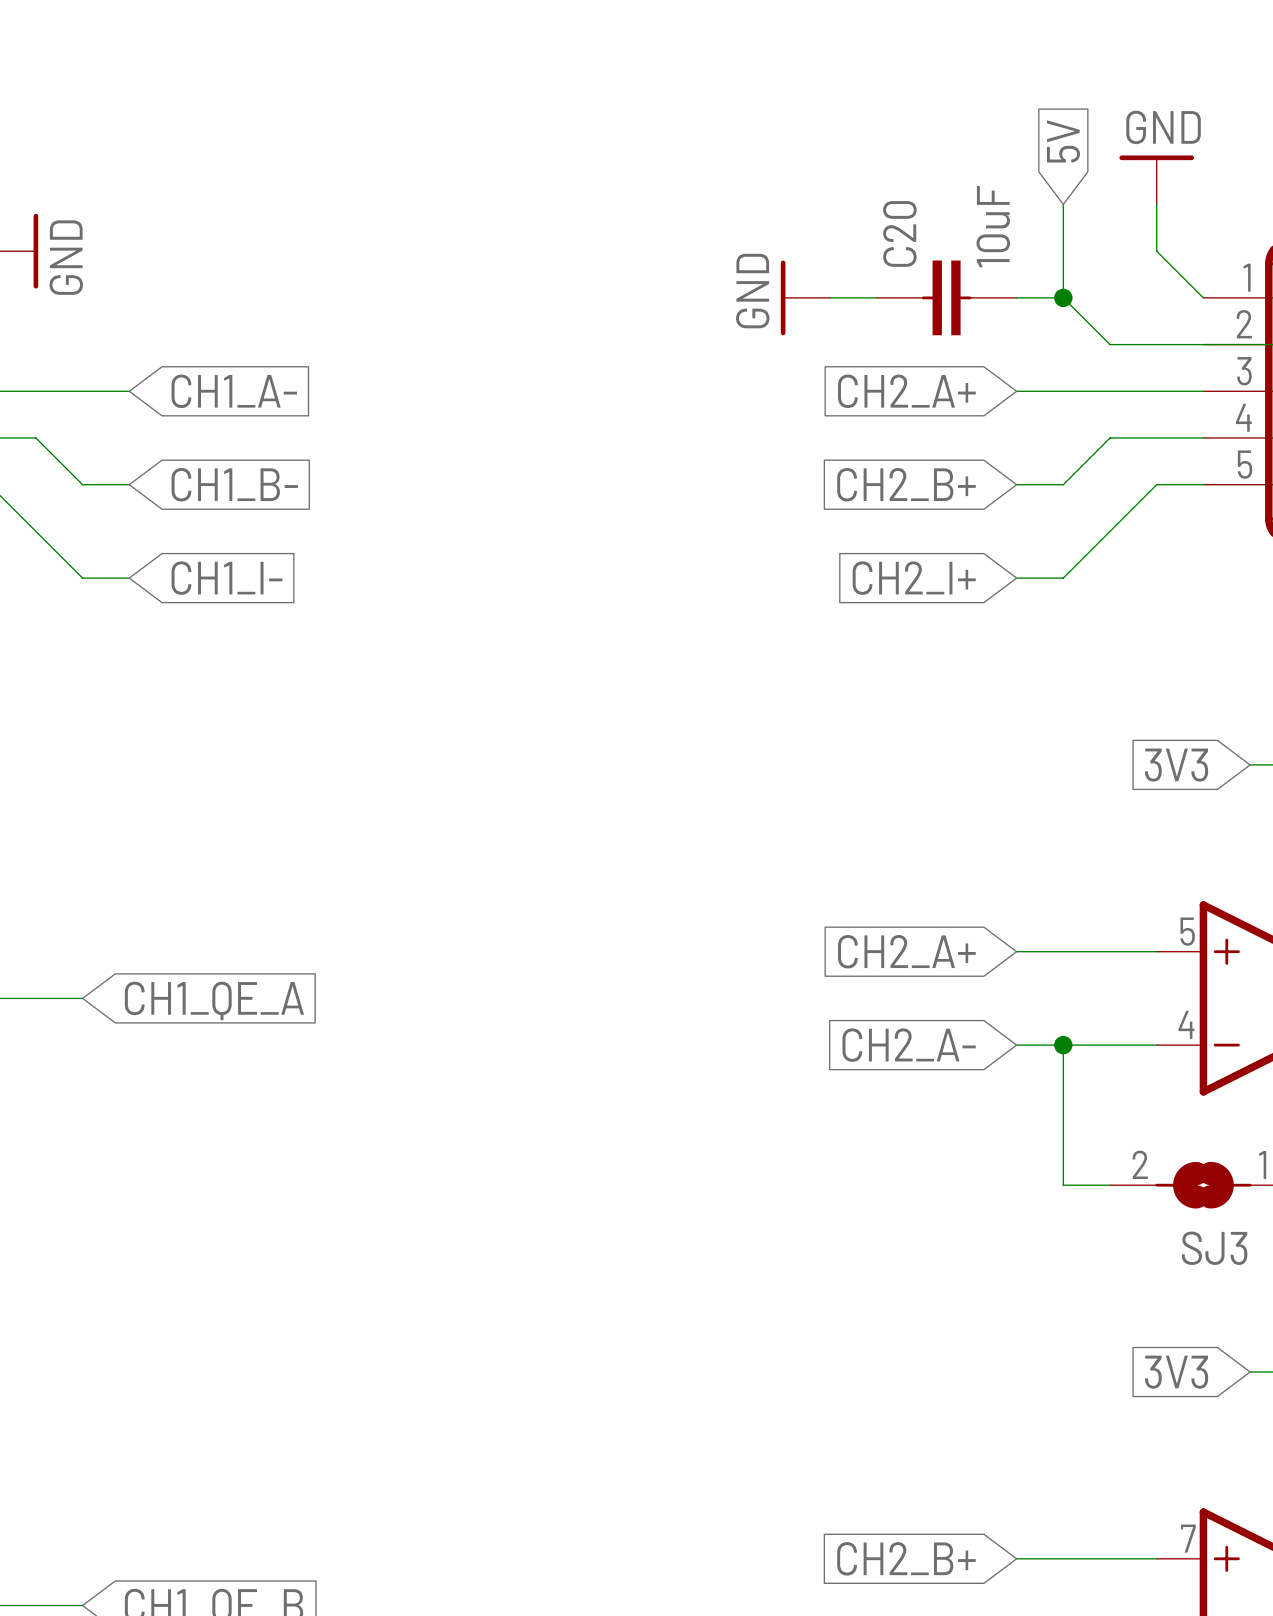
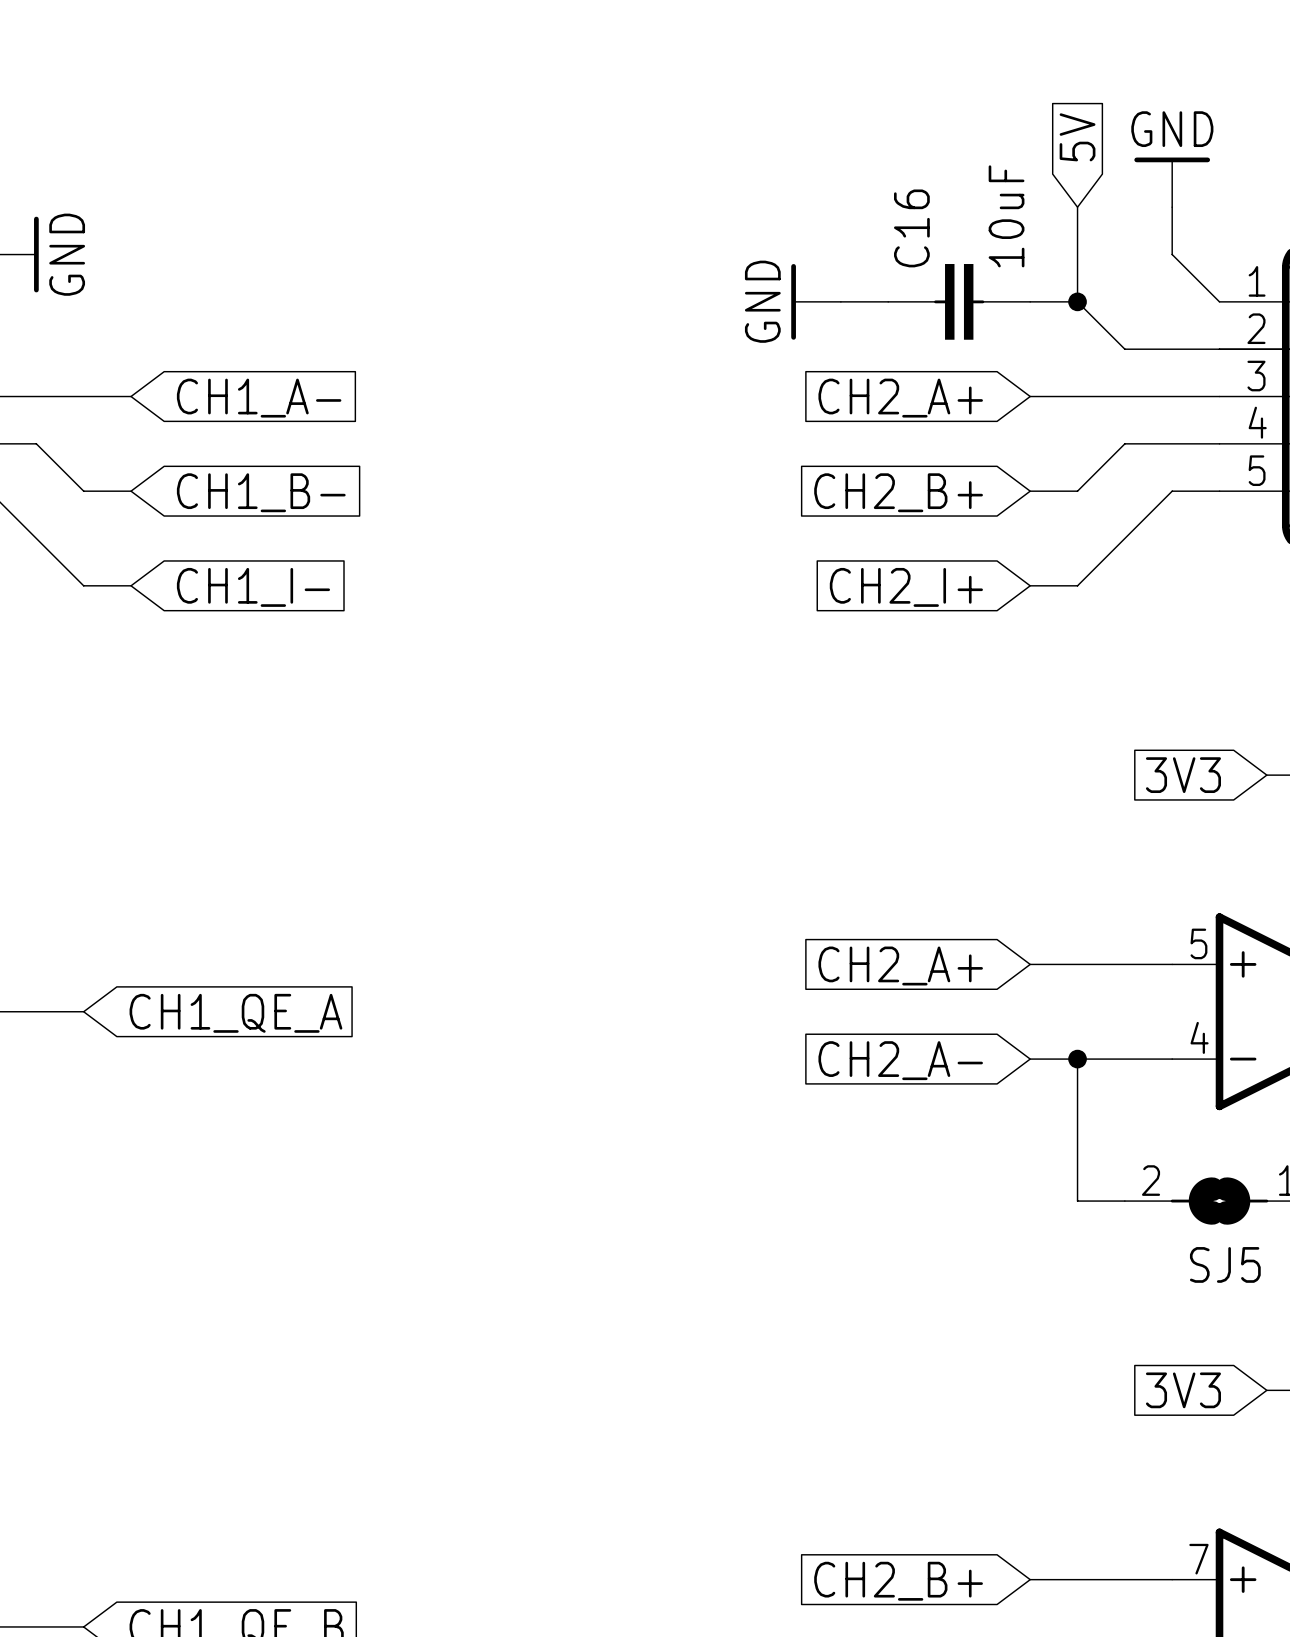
C20 name: C20 (899, 233) -> C16 (911, 228)
SJ3 name: SJ3 (1214, 1248) -> SJ5 (1225, 1264)

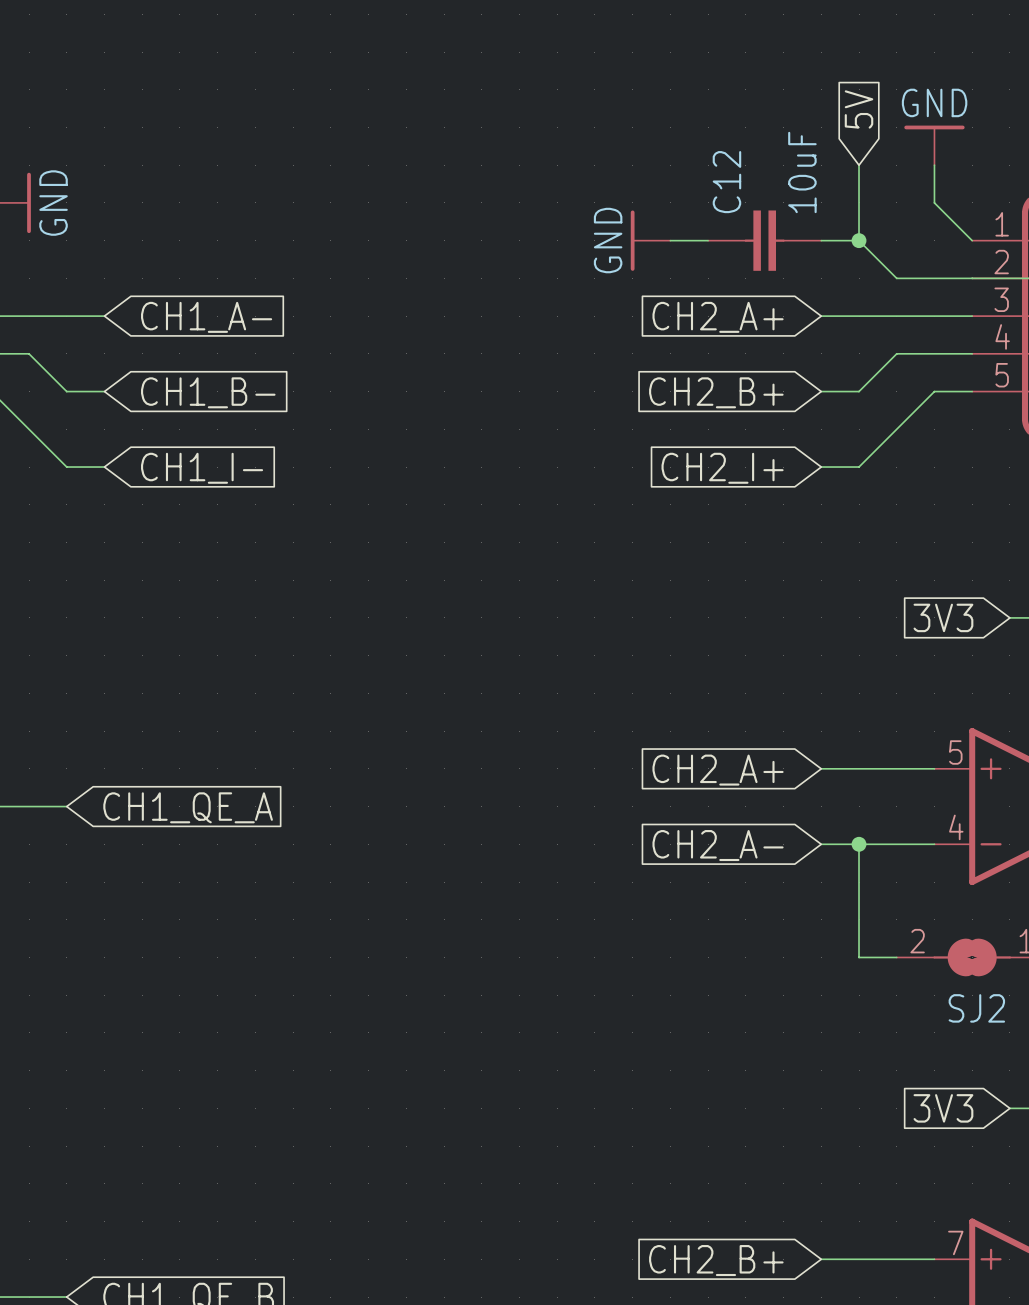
C16 name: C16 (911, 228) -> C12 (726, 182)
SJ5 name: SJ5 (1225, 1264) -> SJ2 (976, 1008)

